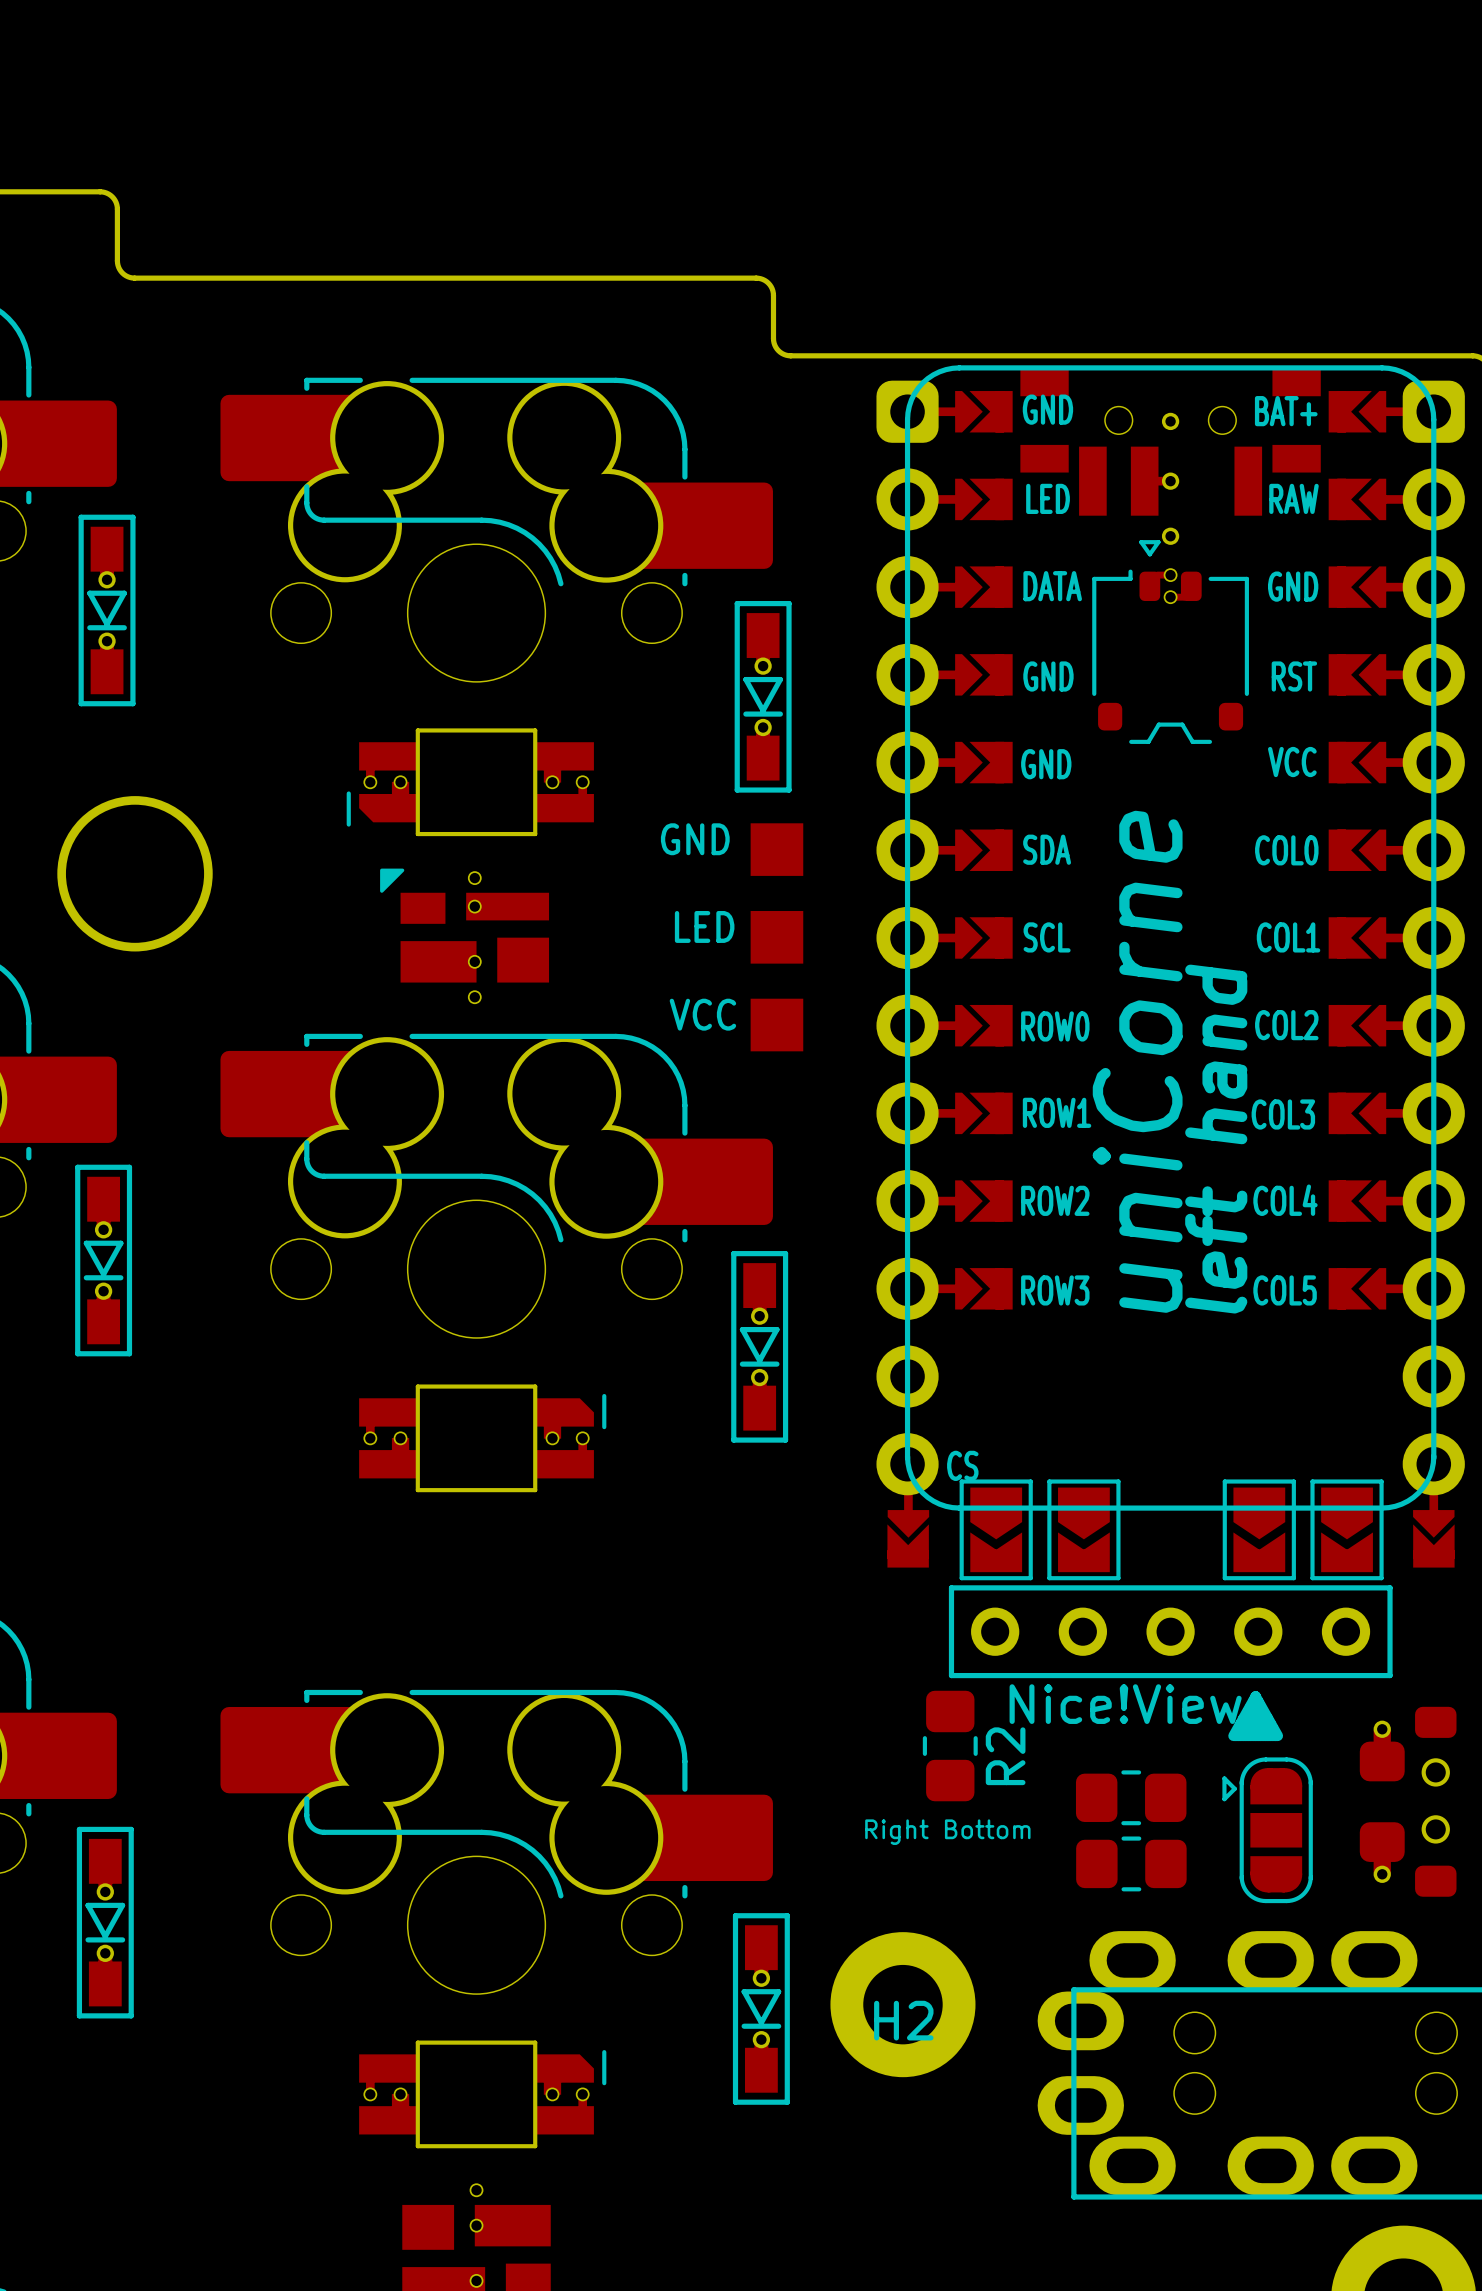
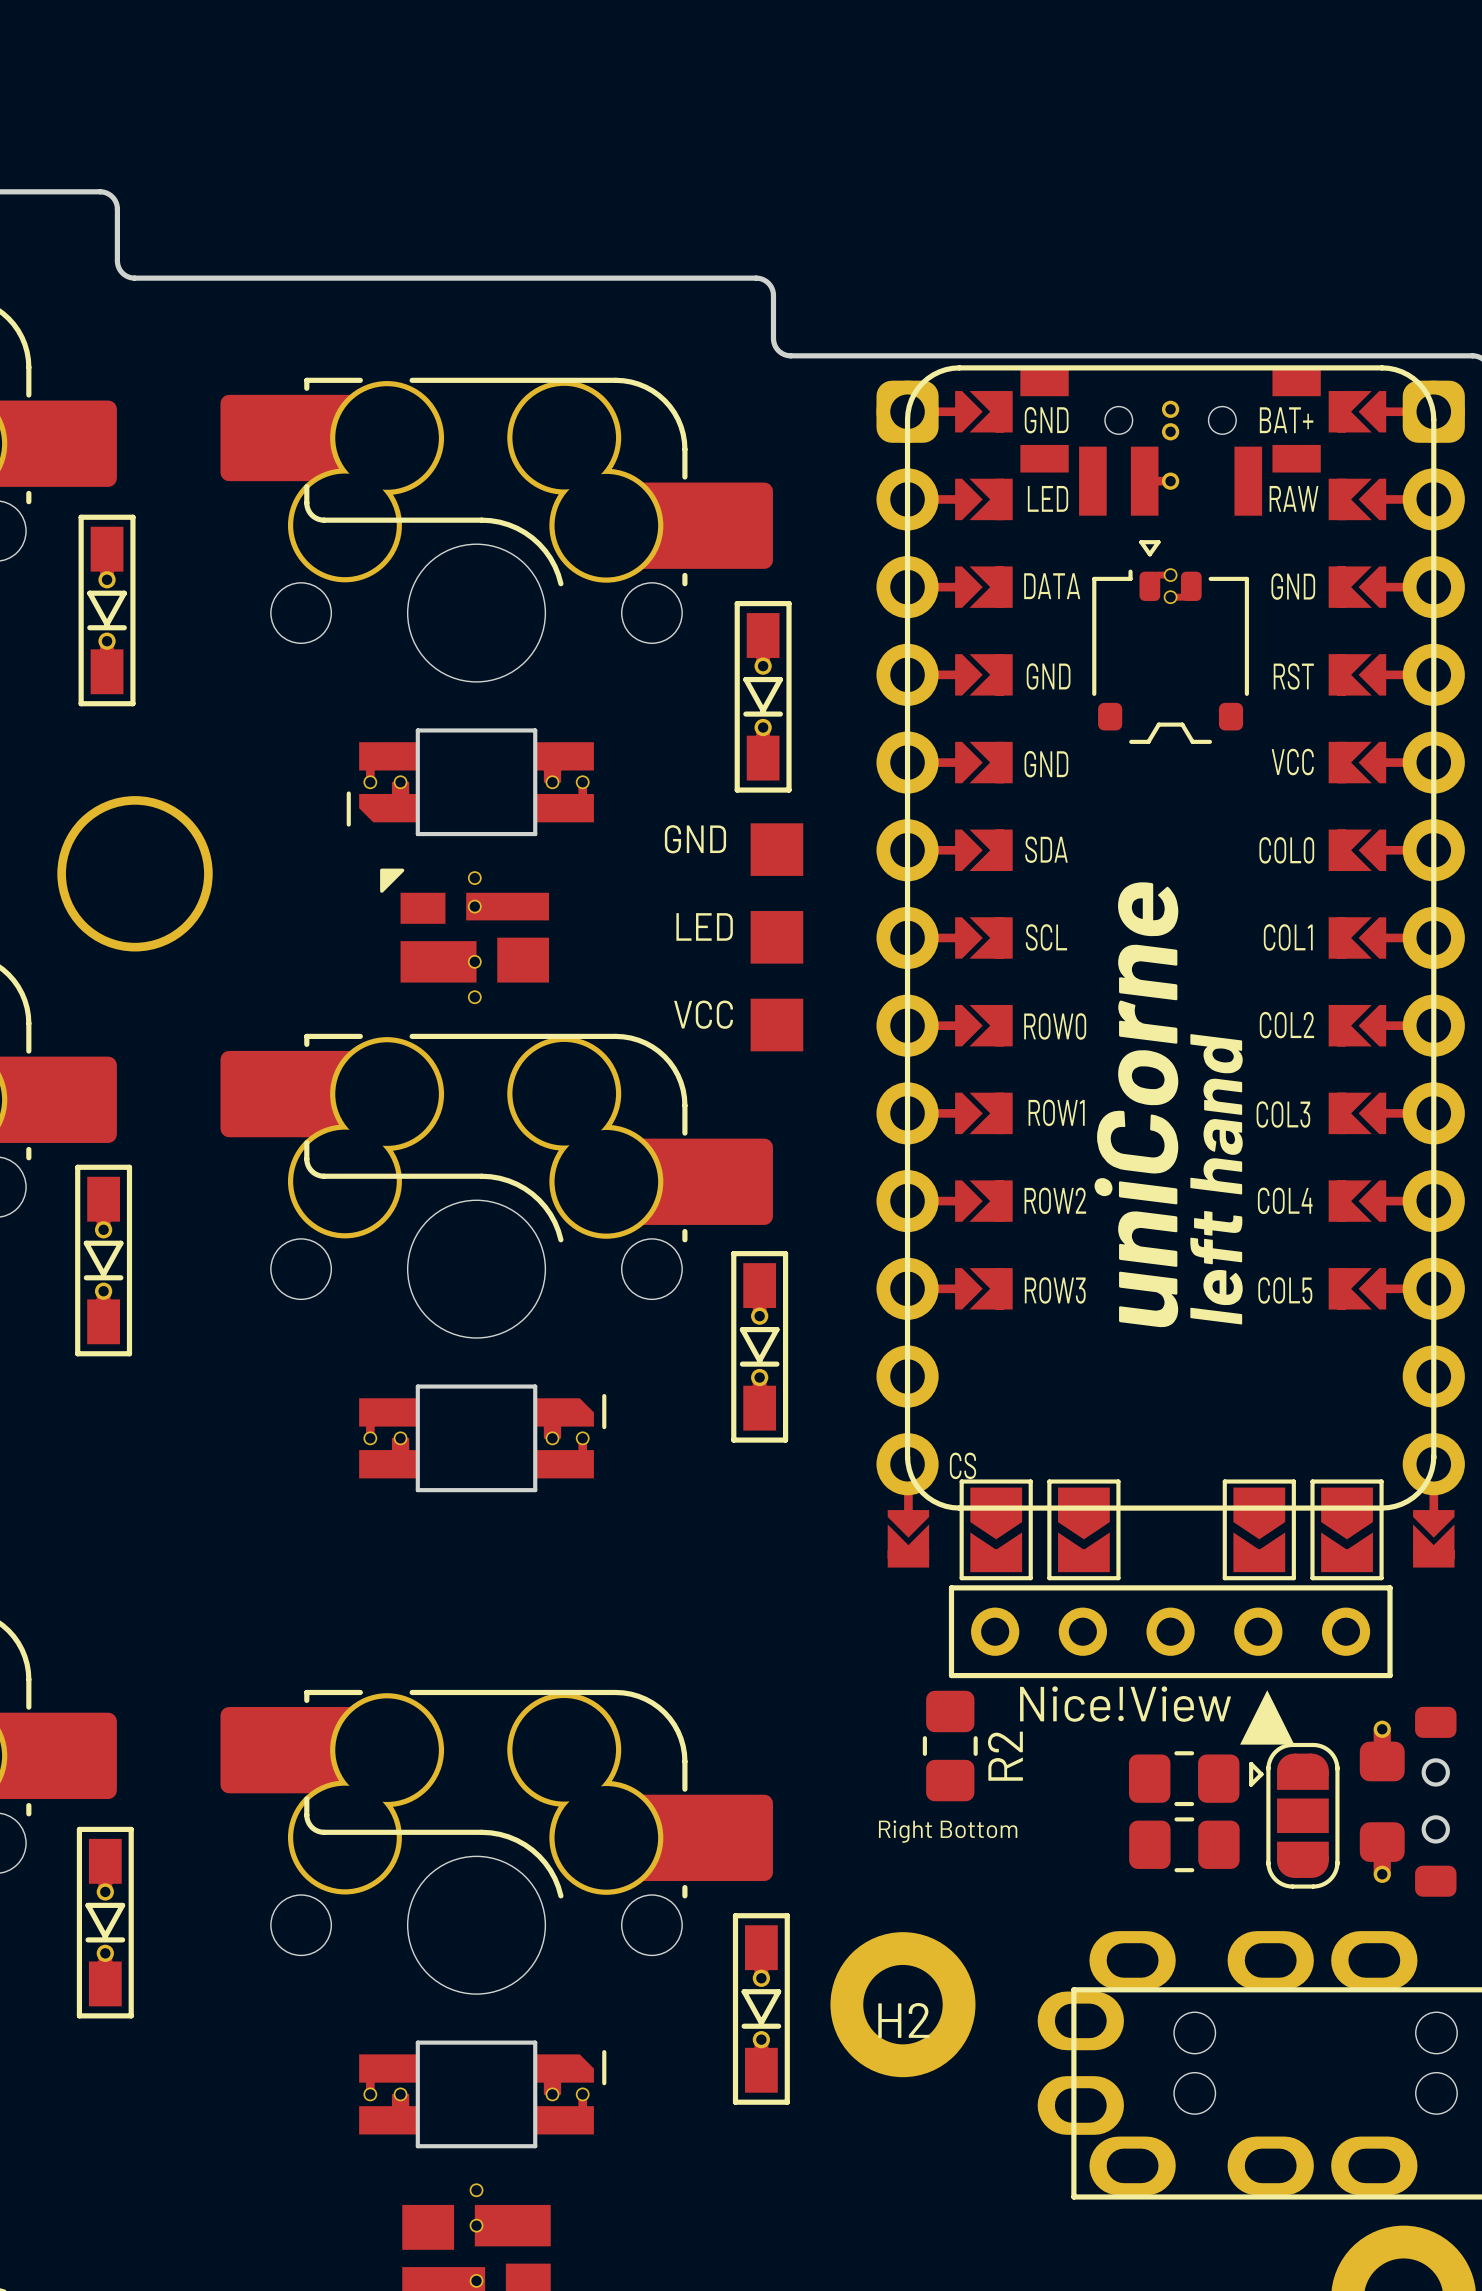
part footprint: [876, 365, 1465, 1568] -> [876, 365, 1465, 1568]
part footprint: [1020, 368, 1321, 545] -> [1020, 368, 1321, 516]
part: none -> (1184, 1778)
part: (1131, 1797) -> none
part position: (1267, 1830) -> (1294, 1815)
part: none -> (1184, 1844)
part: (1131, 1863) -> none

